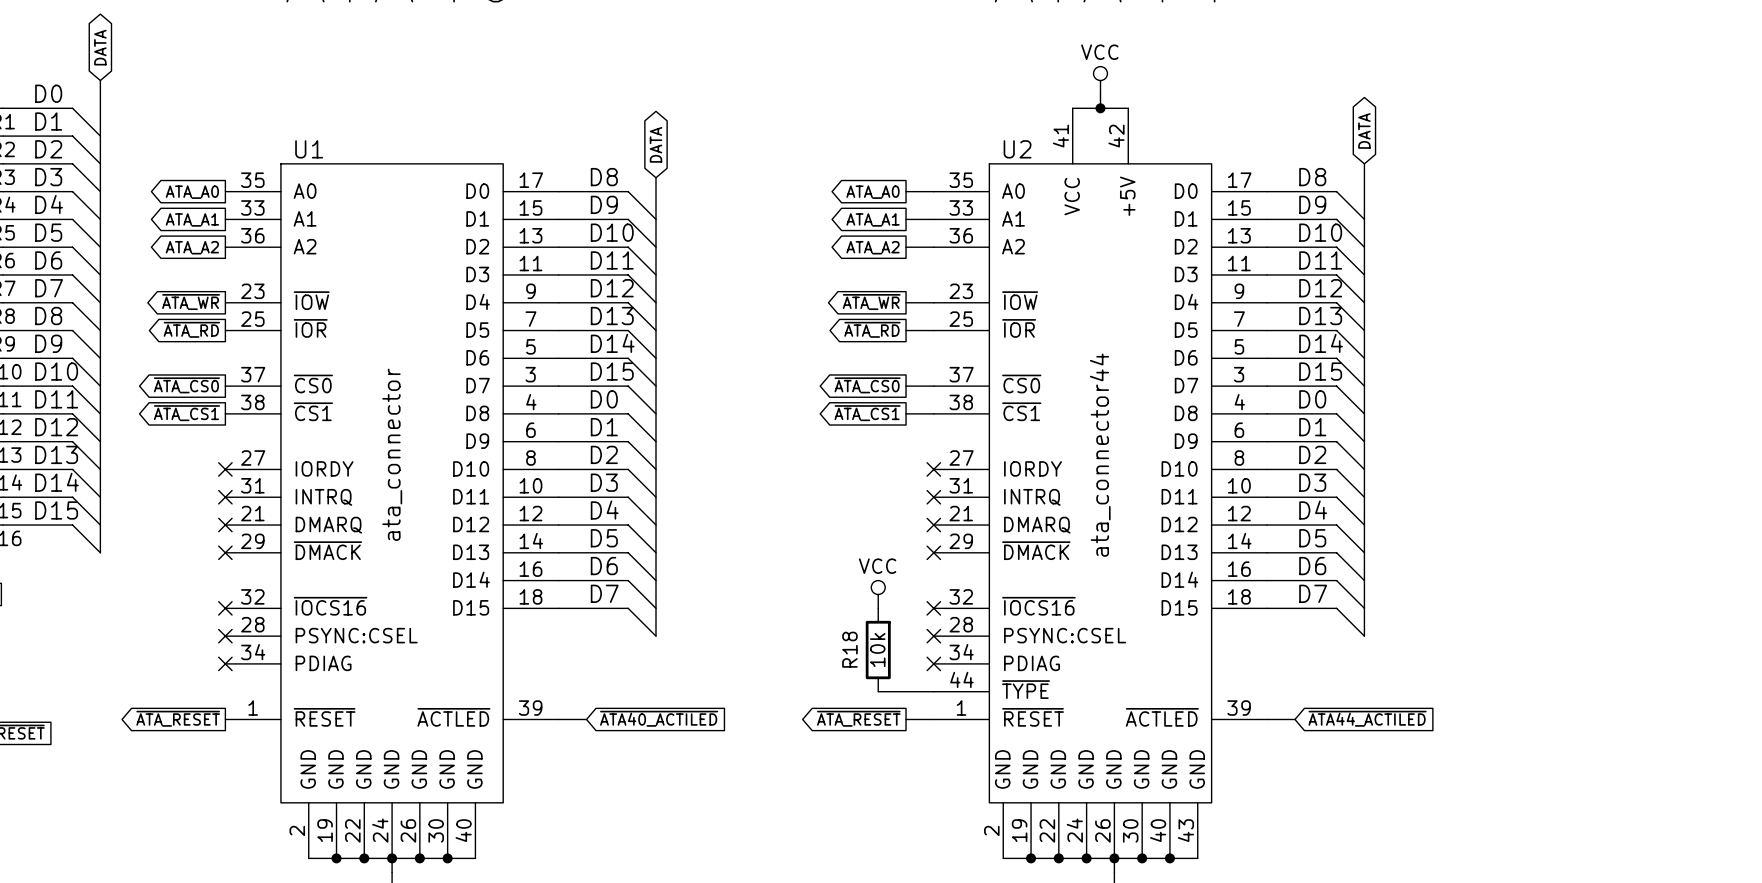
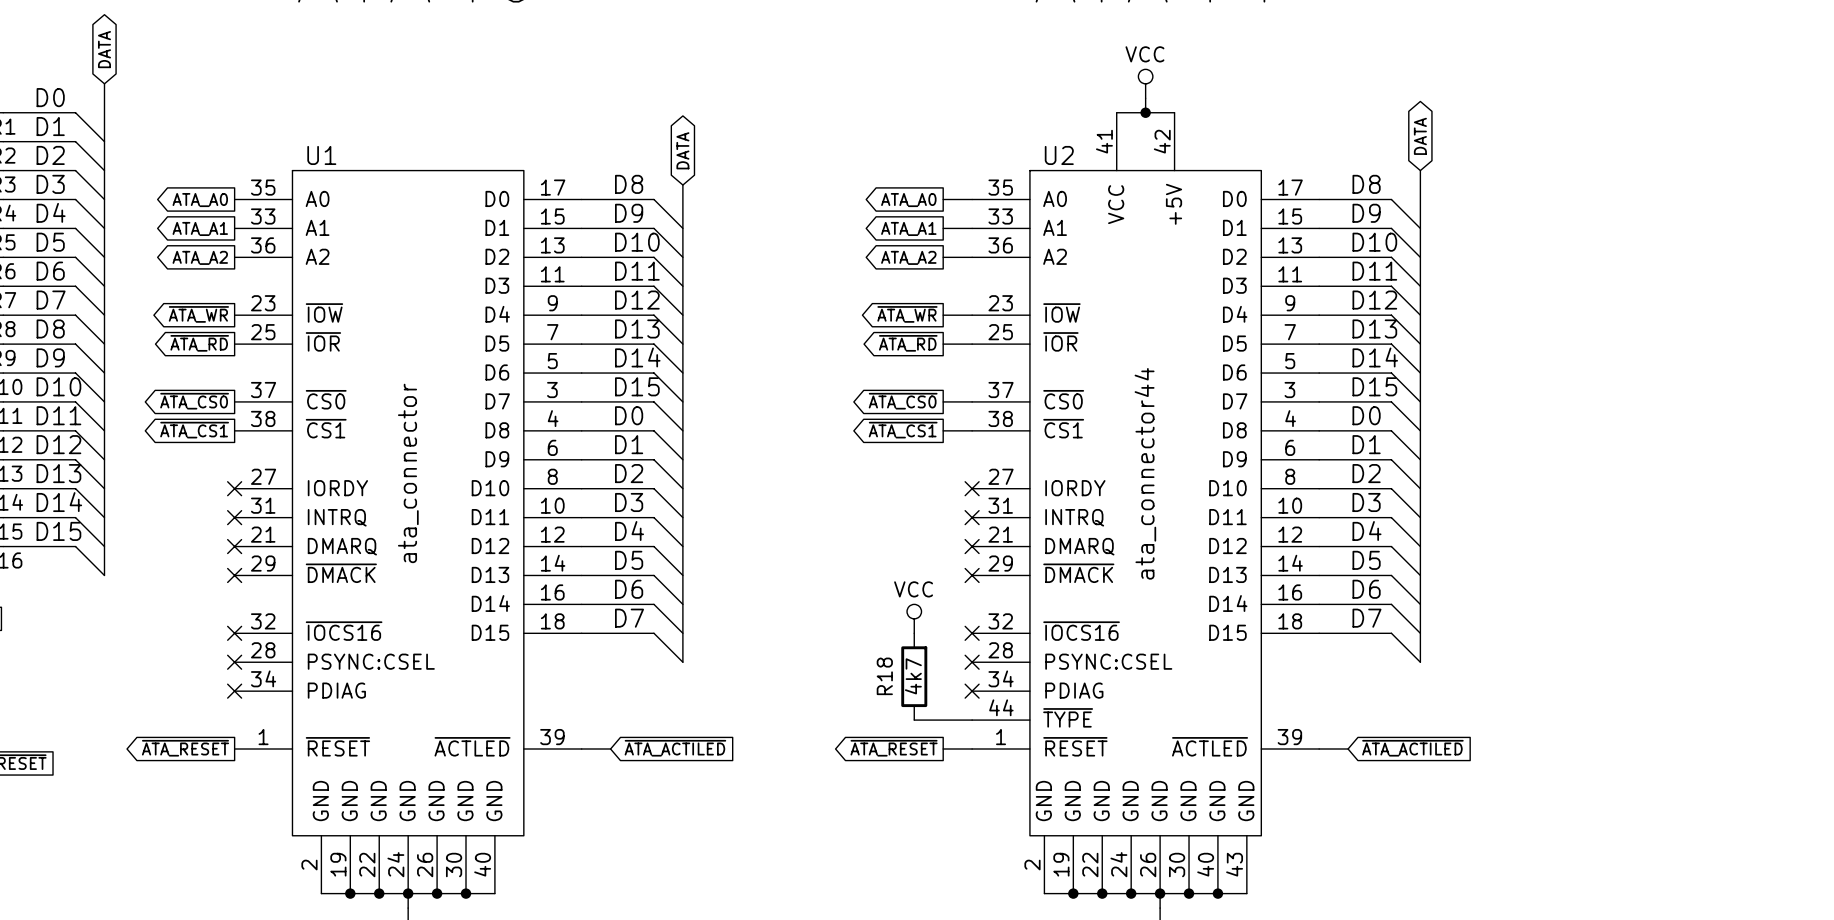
R18 value: 10k (877, 650) -> 4k7 (913, 676)
global label: ~{ATA40_ACTILED} (659, 718) -> ~{ATA_ACTILED} (675, 748)
global label: ~{ATA44_ACTILED} (1367, 718) -> ~{ATA_ACTILED} (1412, 748)

